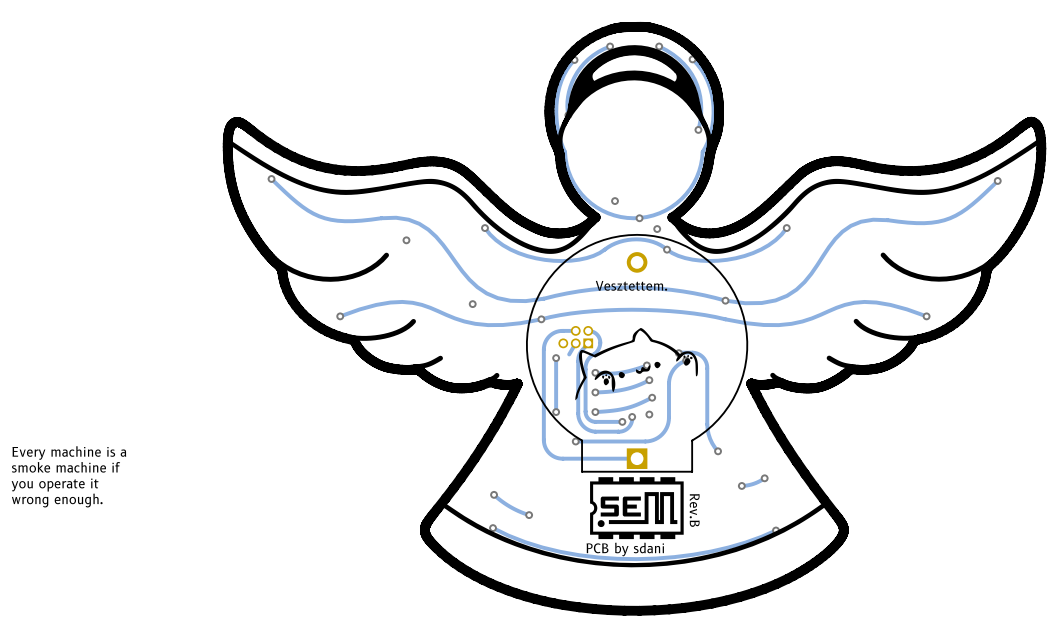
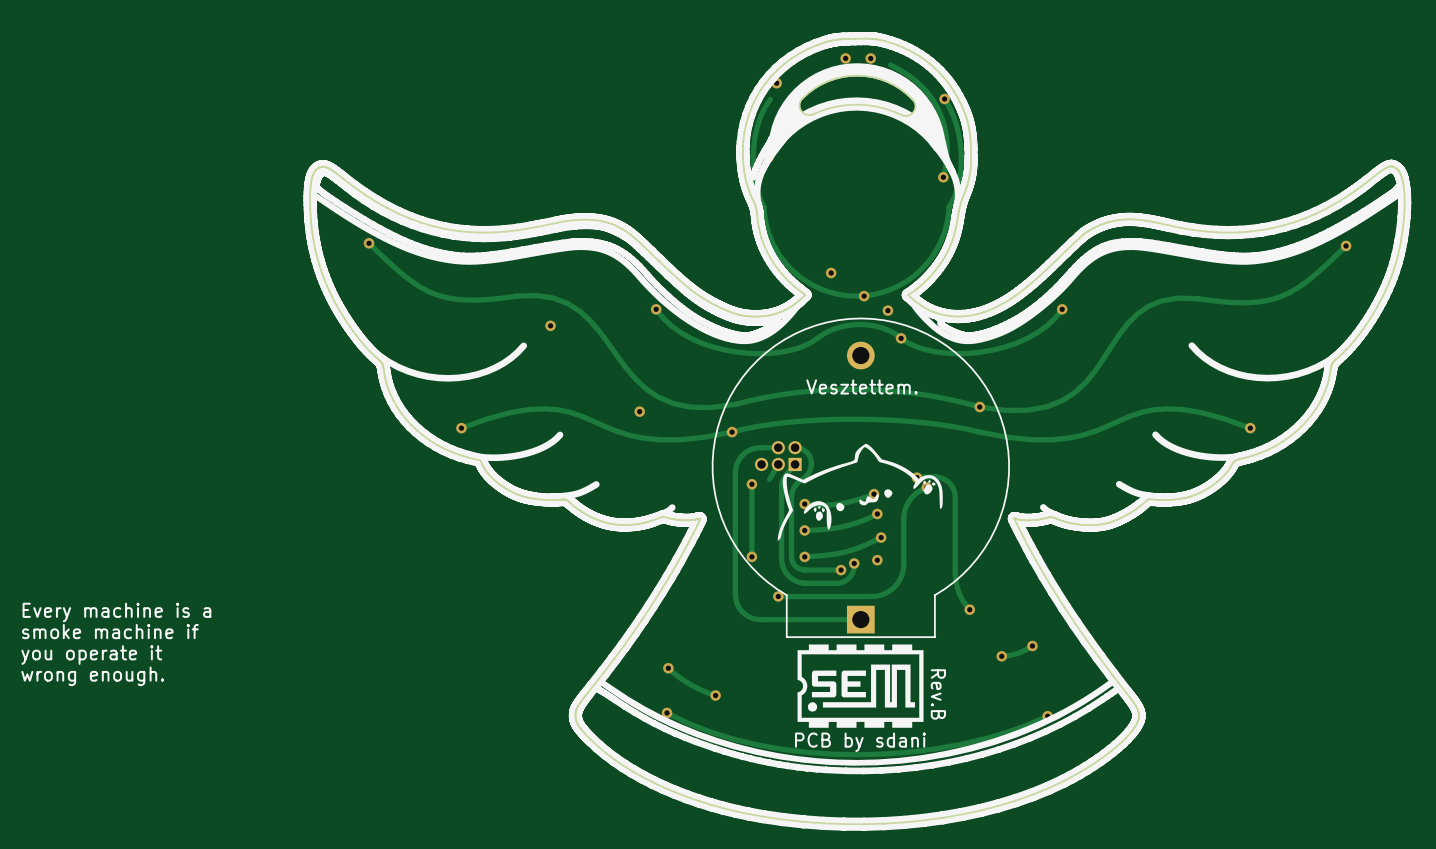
track: (610, 46) (593, 55) (577, 72) (568, 91) (568, 115) -> none
via position: (610, 46) -> (845, 58)
via position: (659, 46) -> (870, 58)
track: (574, 59) (563, 75) (557, 99) (557, 124) (565, 151) -> (770, 99) (758, 122) (753, 150) (755, 179) (763, 207)
track: (692, 59) (705, 75) (712, 100) (712, 126) (702, 151) -> (944, 99) (955, 123) (961, 151) (959, 181) (949, 206)
via position: (692, 59) -> (944, 99)
line: none -> (771, 138) (753, 177)
line: none -> (325, 172) (382, 212) (411, 225) (442, 234) (473, 238) (494, 238) (576, 226) (593, 226) (607, 228) (629, 239) (683, 290) (712, 310) (743, 321) (778, 320) (767, 328) (747, 335) (733, 333) (714, 327) (680, 306) (628, 256) (617, 248) (600, 243) (570, 241) (476, 255) (451, 254) (424, 248) (380, 228) (321, 191) (316, 187) (316, 184) (320, 174) (325, 172)
line: none -> (1397, 186) (1363, 211) (1328, 231) (1298, 245) (1270, 253) (1250, 255) (1230, 255) (1136, 241) (1105, 245) (1083, 259) (1051, 291) (1028, 311) (1005, 324) (981, 333) (969, 335) (958, 333) (943, 326) (931, 314)
line: none -> (598, 689) (664, 728) (723, 751) (788, 765) (863, 770) (932, 765) (999, 749) (1060, 724) (1115, 690)

